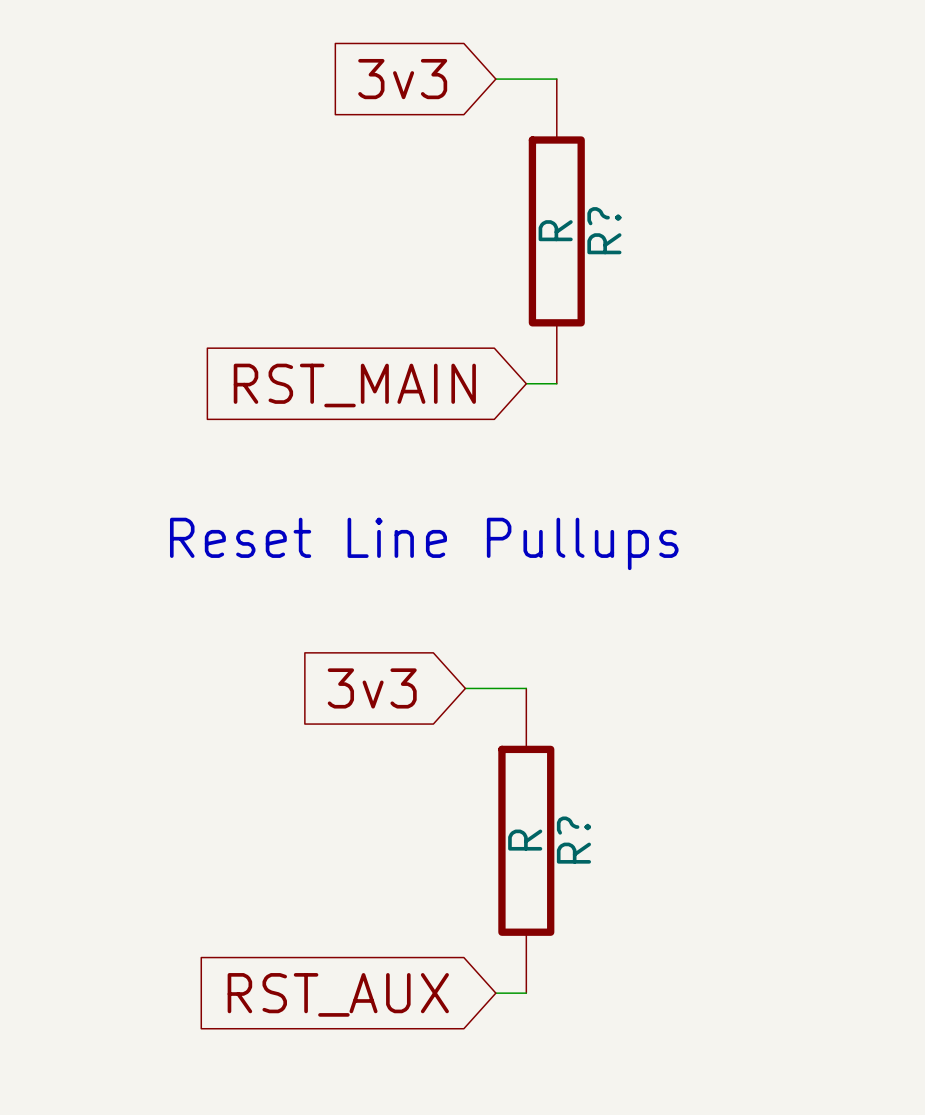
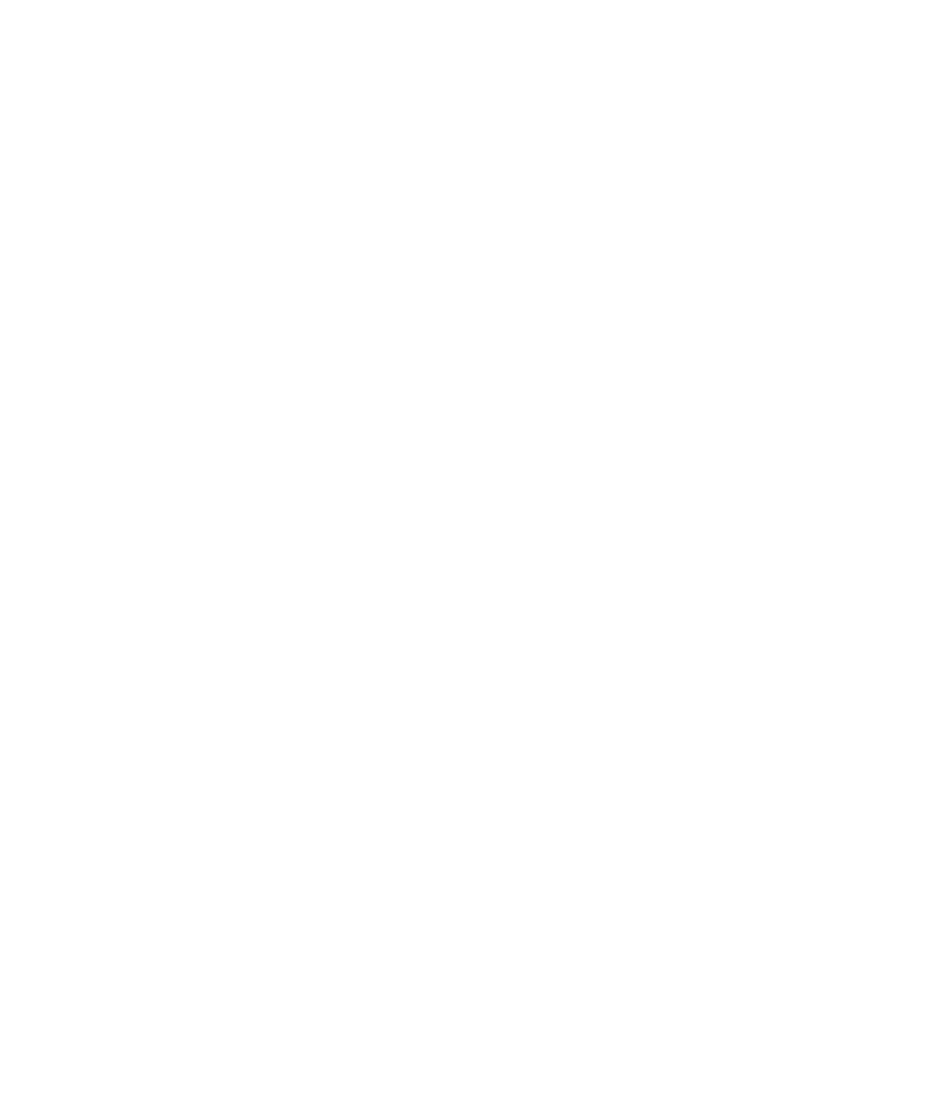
global label: 3v3 (402, 79) -> none
wire: (495, 79) (556, 79) -> none
R?: R (556, 231) -> none
wire: (526, 383) (556, 383) -> none
global label: RST_MAIN (354, 385) -> none
text: Reset Line Pullups (424, 543) -> none
global label: 3v3 (372, 688) -> none
wire: (465, 688) (526, 688) -> none
R?: R (526, 840) -> none
wire: (495, 993) (526, 993) -> none
global label: RST_AUX (338, 994) -> none

